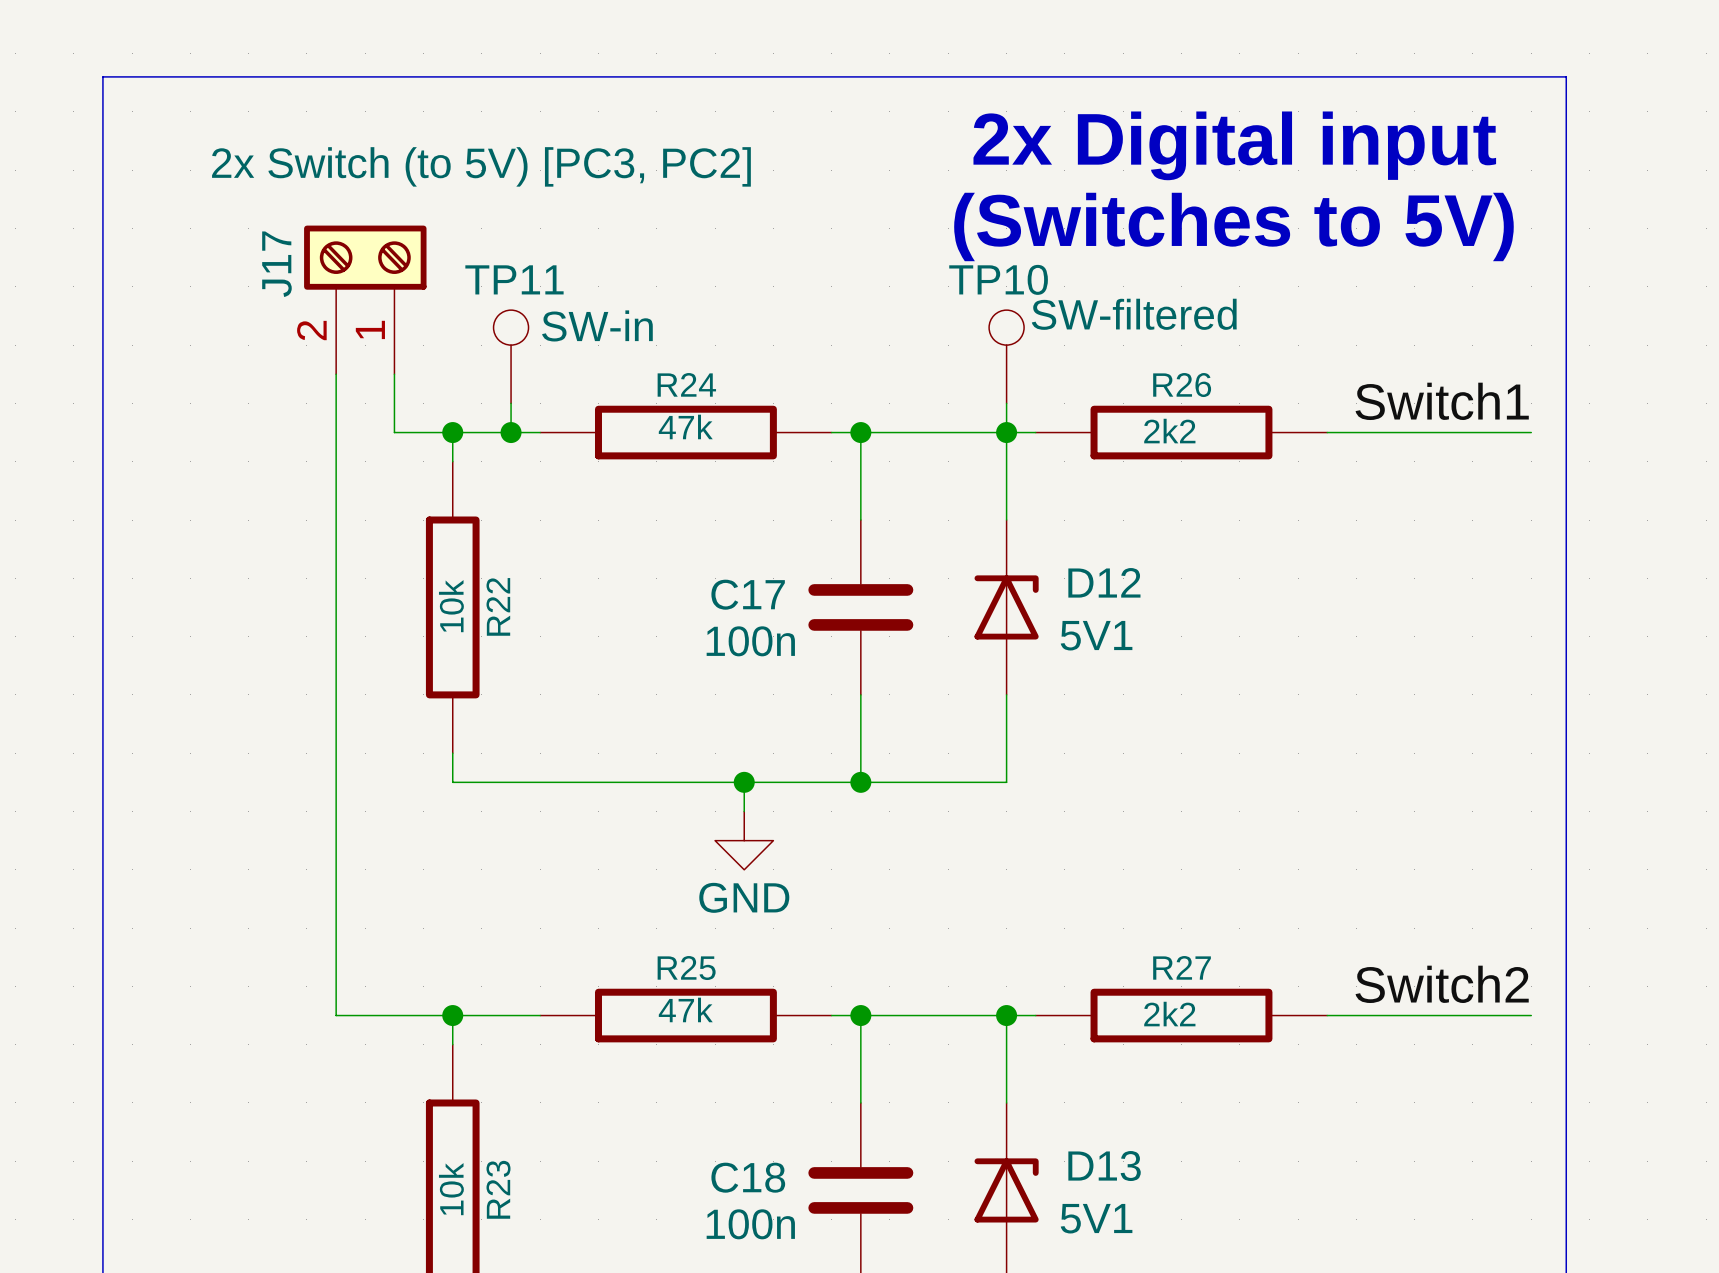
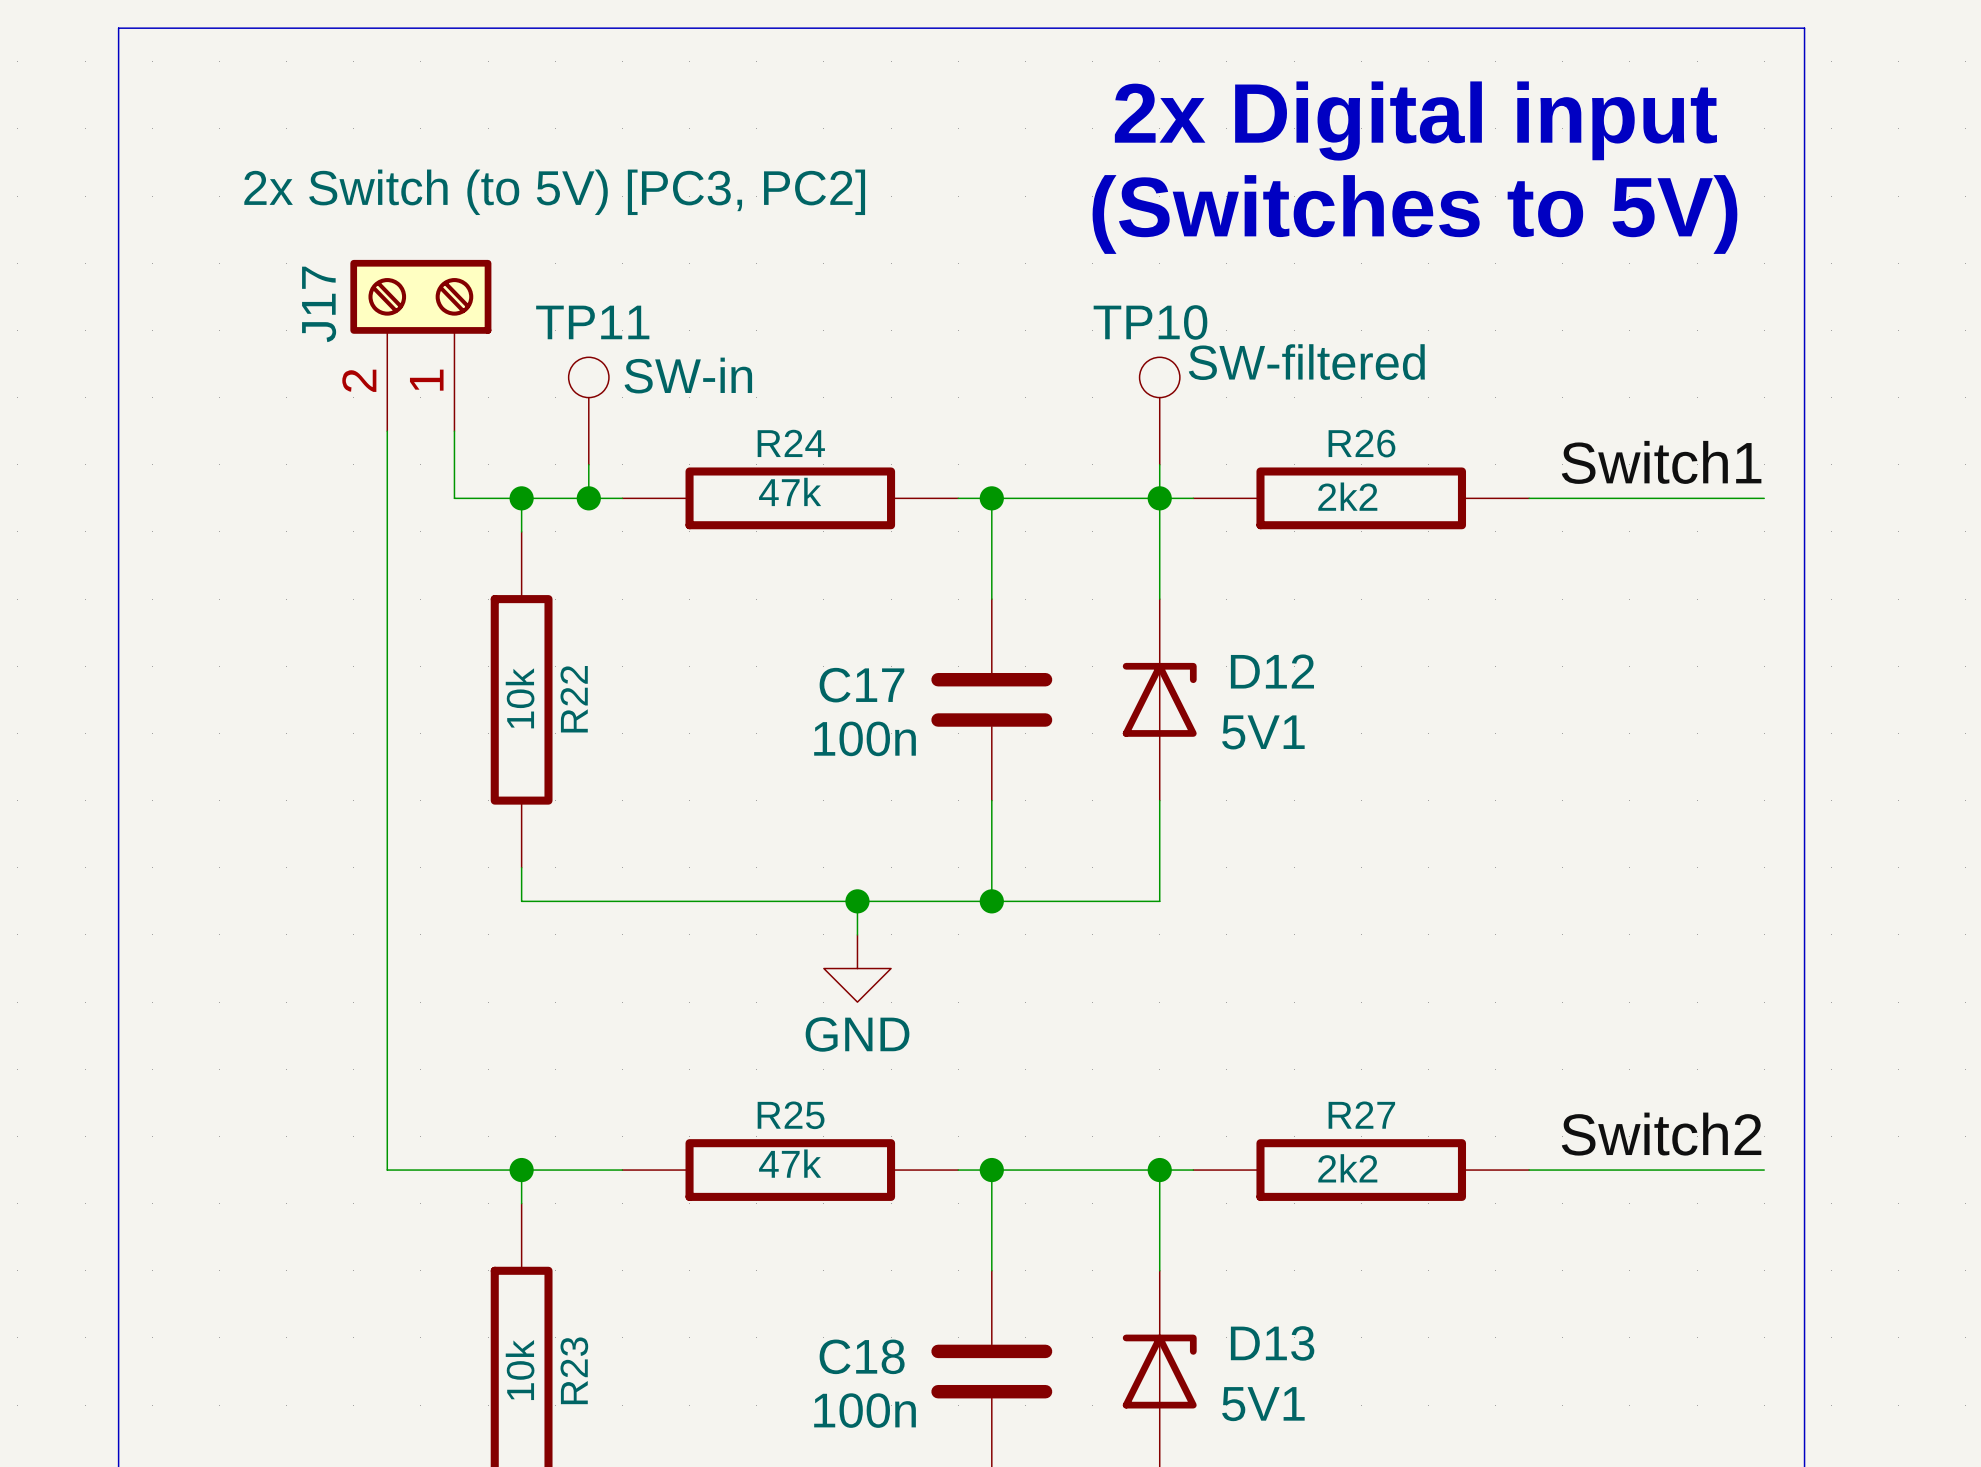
line: (102, 76) (1566, 76) -> (118, 88) (118, 28) (1804, 28) (1804, 88)
text position: 2x Digital input (1234, 145) -> 2x Digital input (1415, 121)
text position: (Switches to 5V) (1233, 226) -> (Switches to 5V) (1414, 214)

